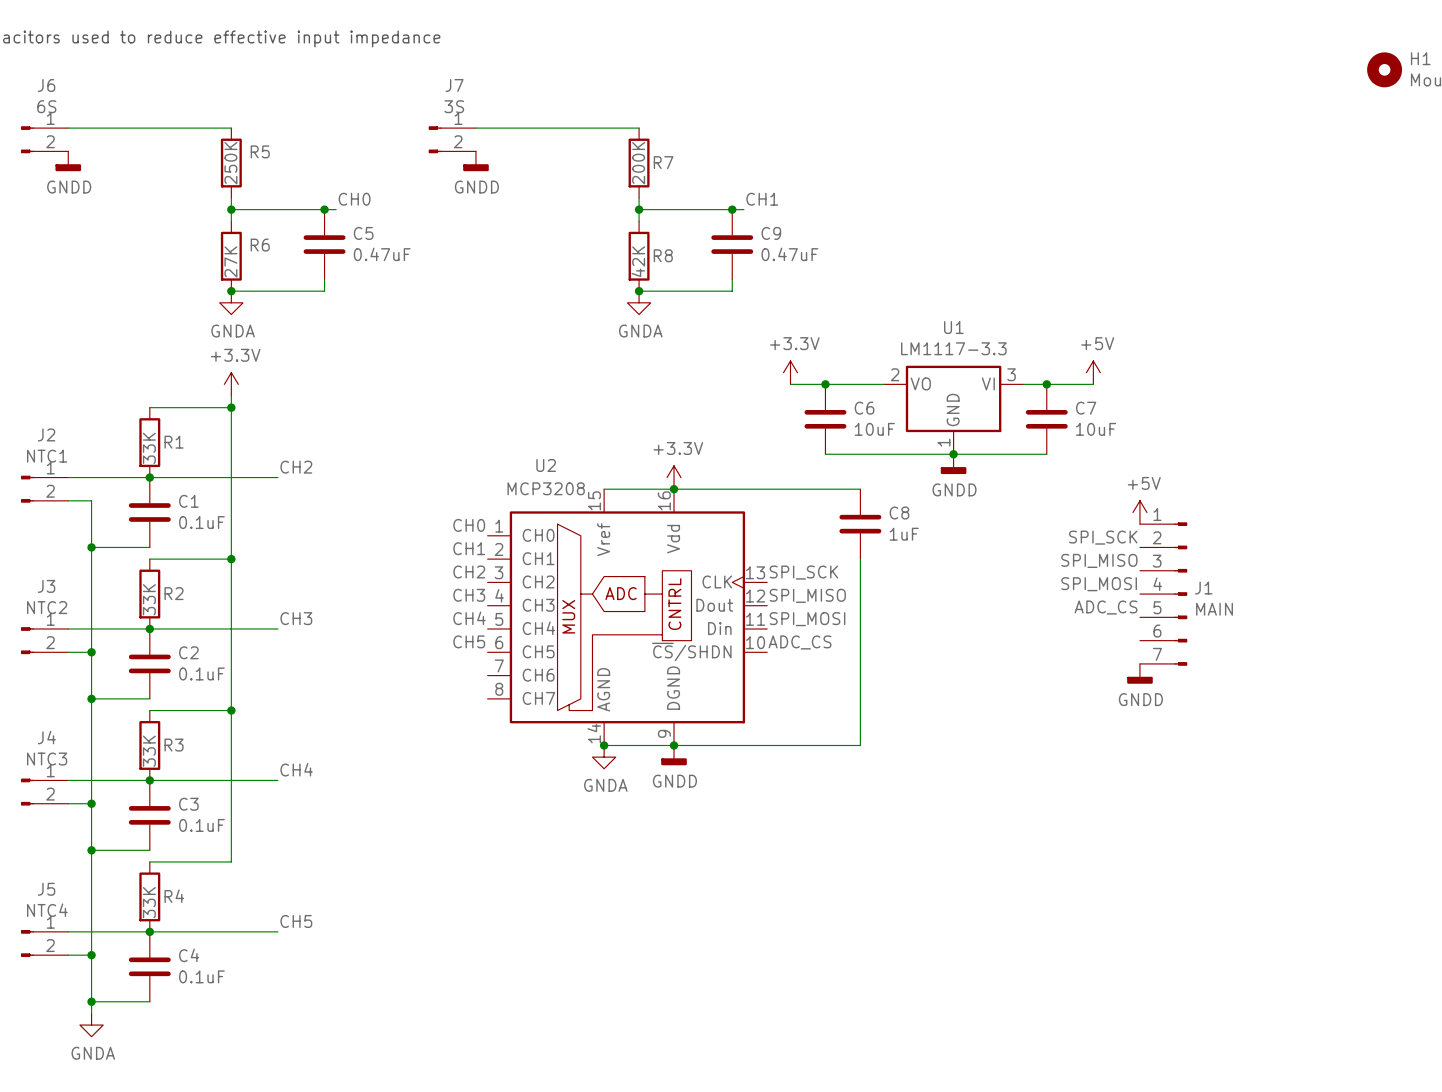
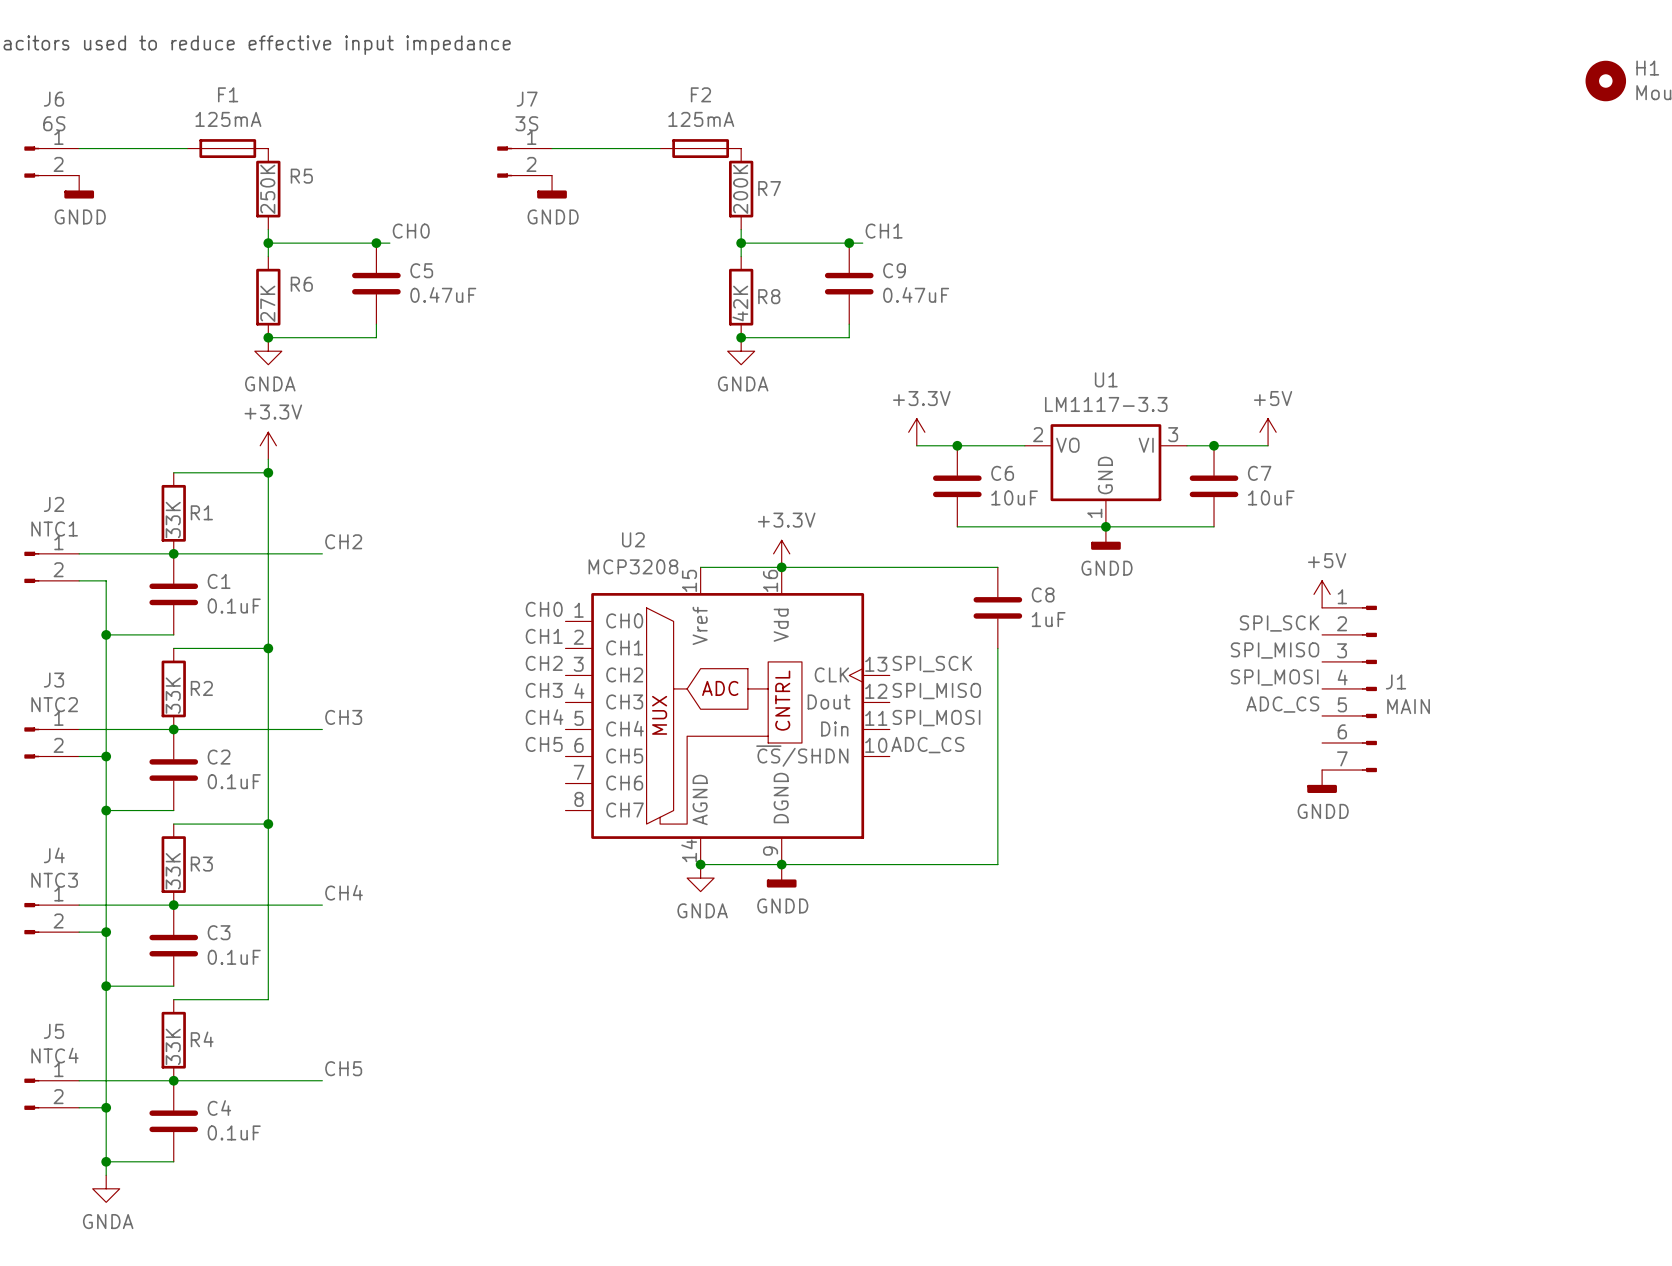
F1: none -> 125mA (227, 148)
F2: none -> 125mA (700, 148)

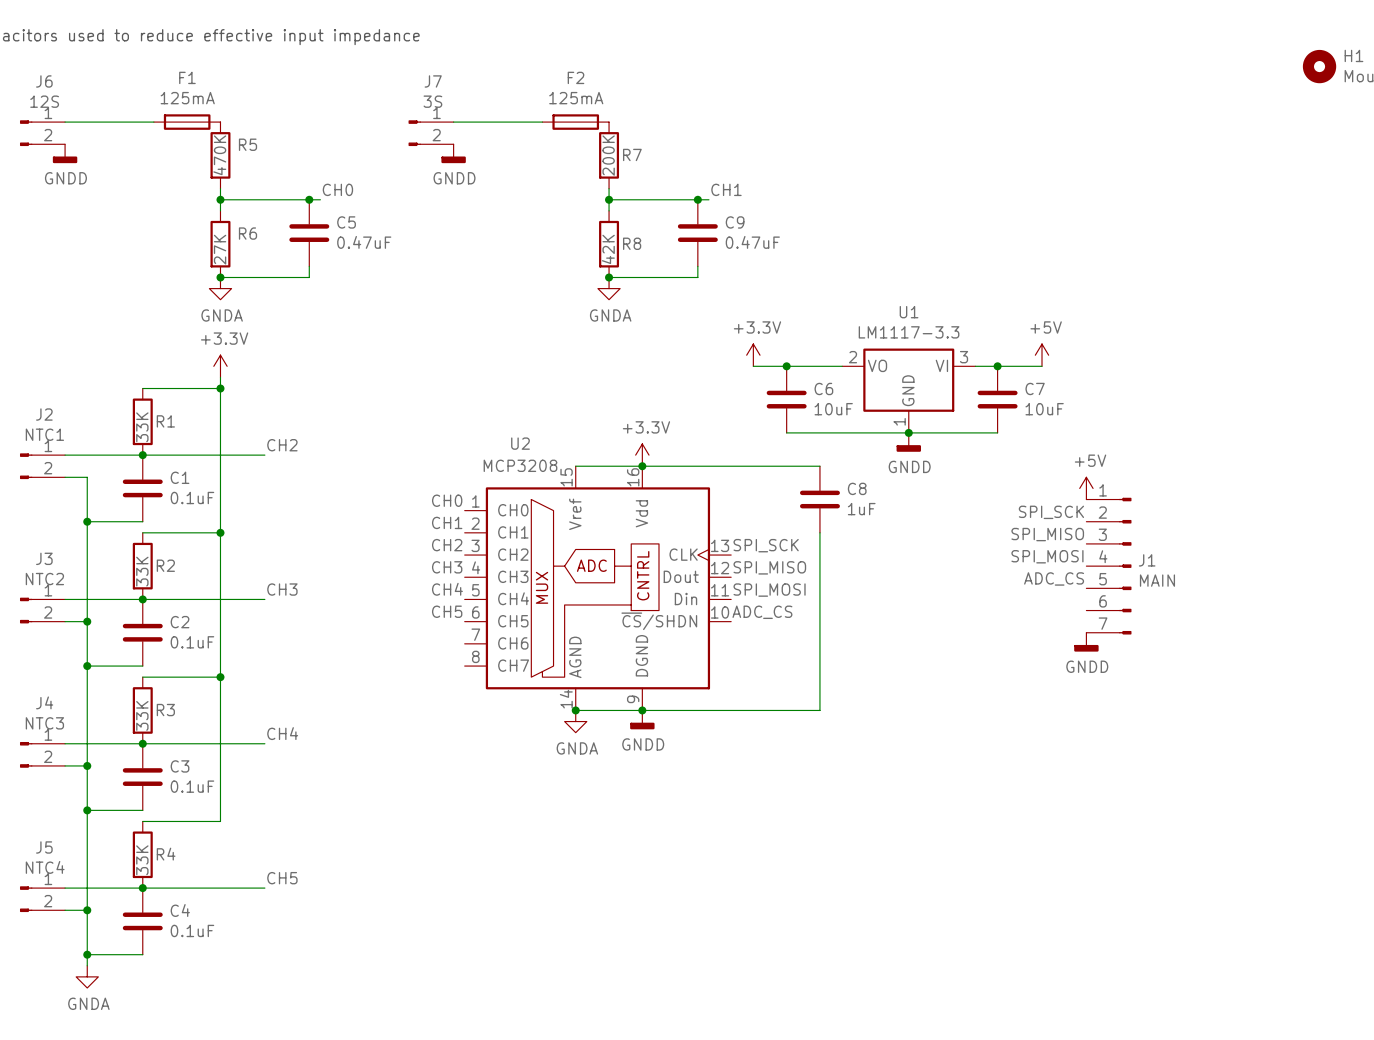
J6 value: 6S (54, 123) -> 12S (44, 101)
R5 value: 250K (267, 189) -> 470K (219, 155)

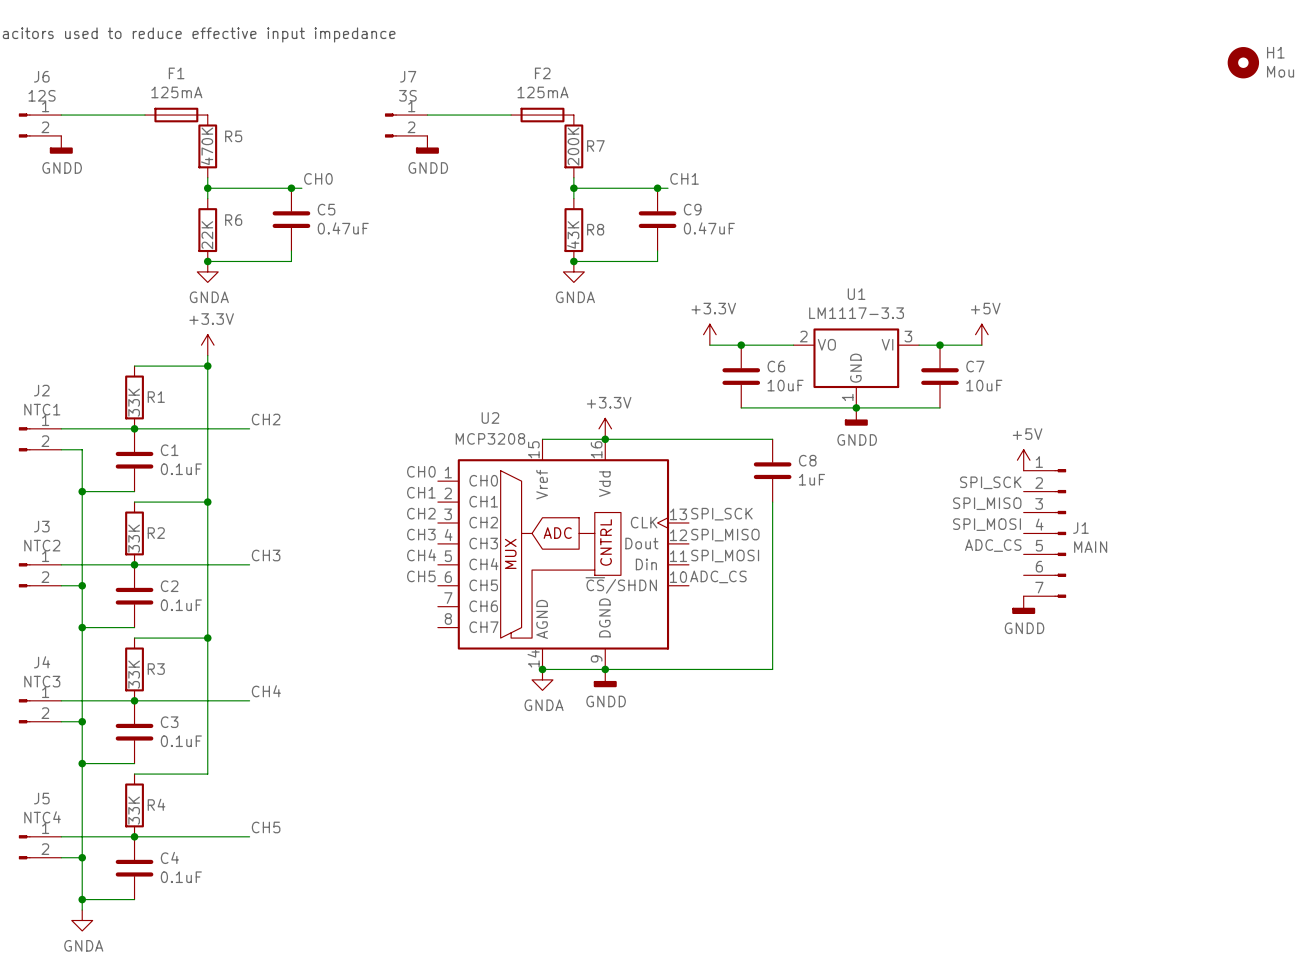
R6 value: 27K (220, 249) -> 22K (207, 235)
R8 value: 42K (608, 249) -> 43K (573, 234)

